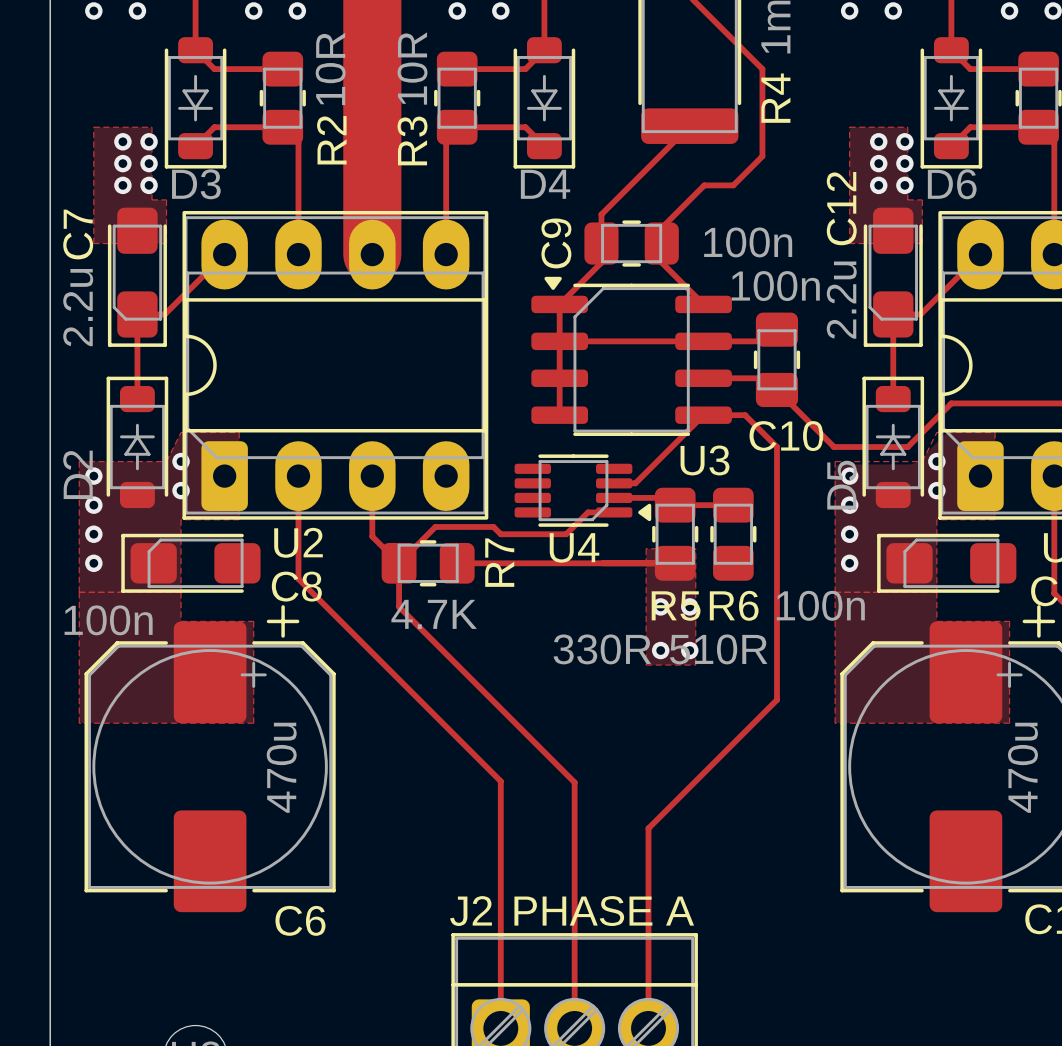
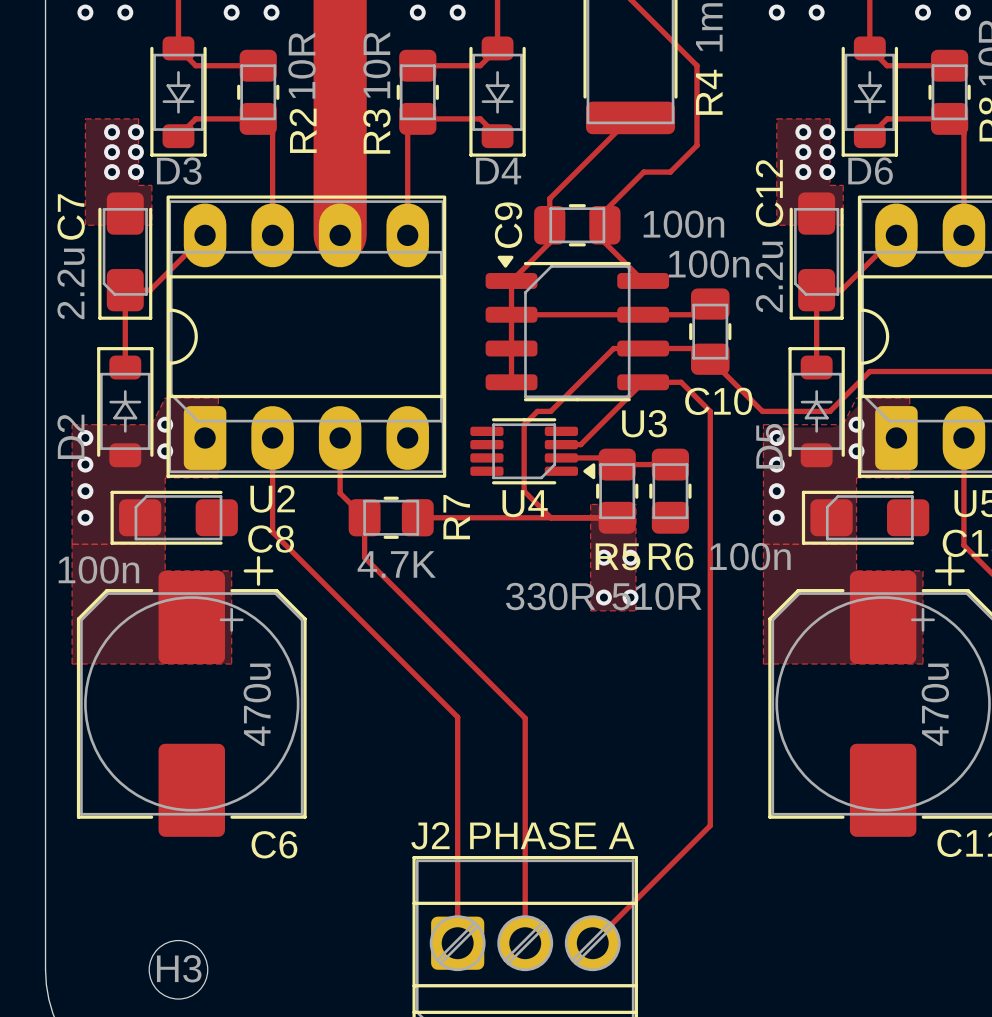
track: none -> (643, 348) (613, 348) (550, 411) (537, 411) (524, 424) (524, 491) (550, 517)
track: (614, 512) (588, 512) (566, 534) (500, 534) (493, 526) (435, 526) (399, 563) -> none
track: (776, 699) (648, 828) (648, 1028) -> (710, 642) (710, 825) (592, 943)

